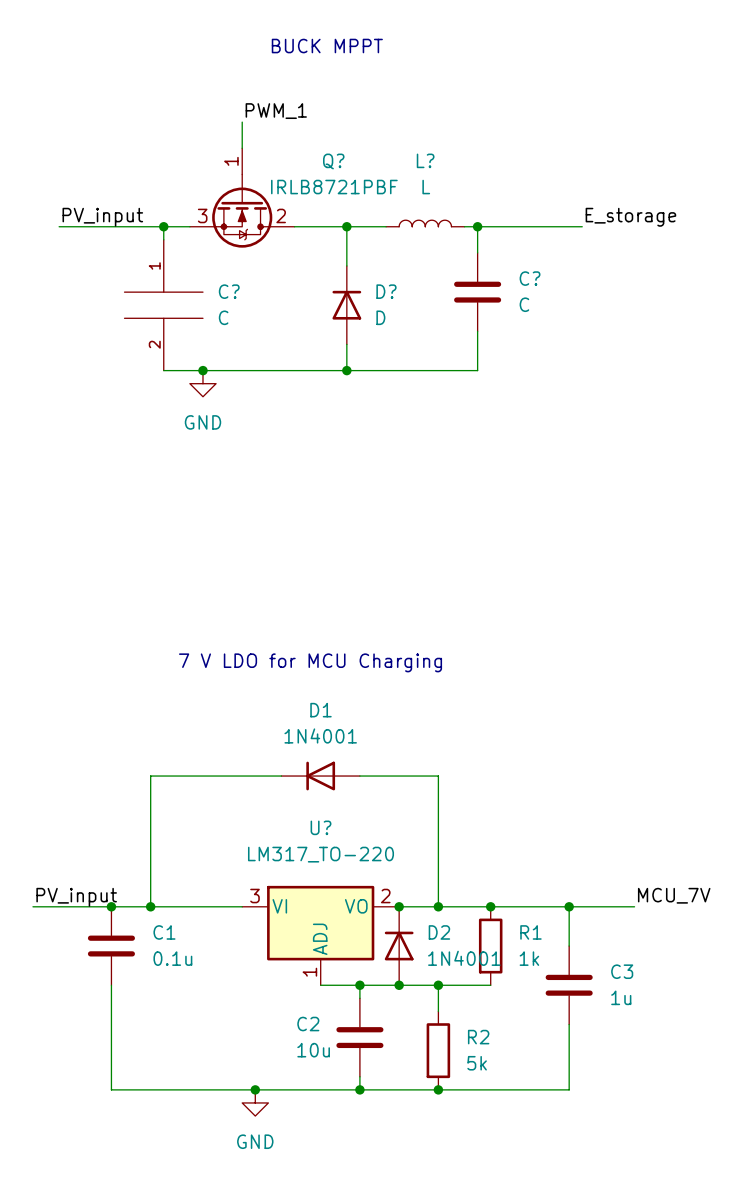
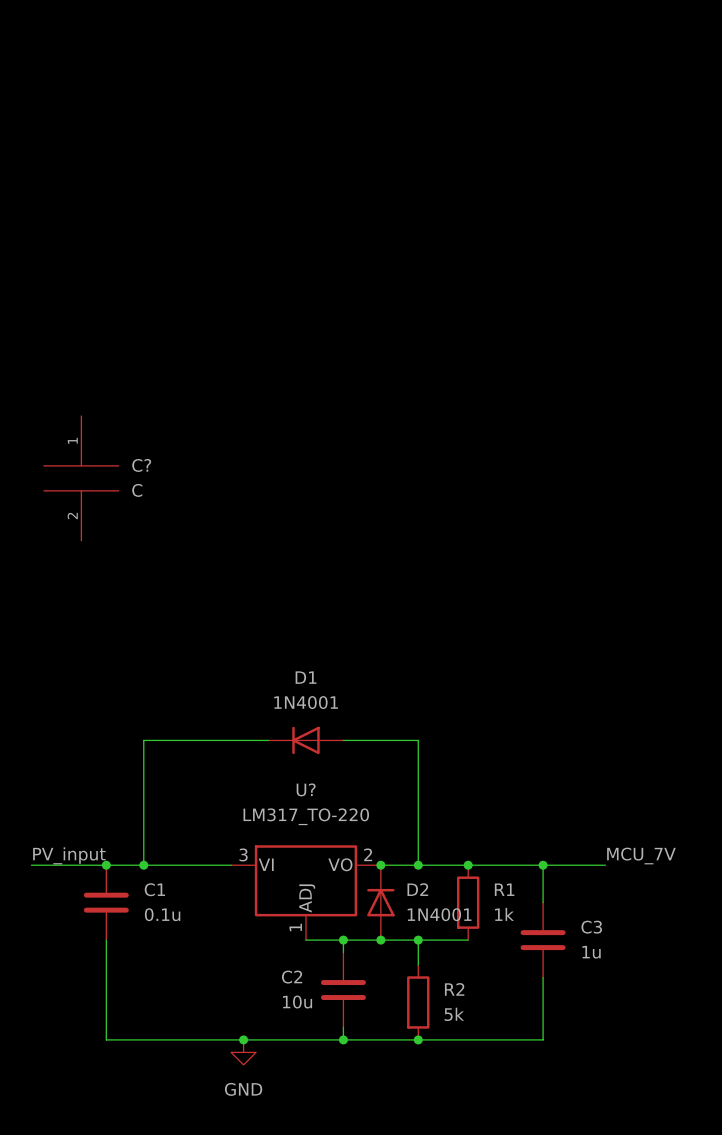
text: BUCK MPPT (327, 46) -> none
label: PWM_1 (276, 111) -> none
wire: (242, 122) (242, 148) -> none
Q?: IRLB8721PBF (242, 197) -> none
label: PV_input (102, 217) -> none
label: E_storage (630, 217) -> none
L?: L (425, 223) -> none
wire: (59, 226) (189, 226) -> none
wire: (163, 226) (163, 239) -> none
junction: (163, 226) -> none
wire: (294, 226) (386, 226) -> none
wire: (346, 226) (346, 265) -> none
junction: (346, 226) -> none
wire: (464, 226) (582, 226) -> none
wire: (477, 226) (477, 252) -> none
junction: (477, 226) -> none
C?: C (477, 292) -> none
C? position: (163, 305) -> (81, 478)
D?: D (346, 305) -> none
wire: (477, 331) (477, 370) (163, 370) -> none
wire: (346, 344) (346, 370) -> none
junction: (202, 370) -> none
junction: (346, 370) -> none
power symbol: GND (202, 383) -> none
text: 7 V LDO for MCU Charging (310, 662) -> none

